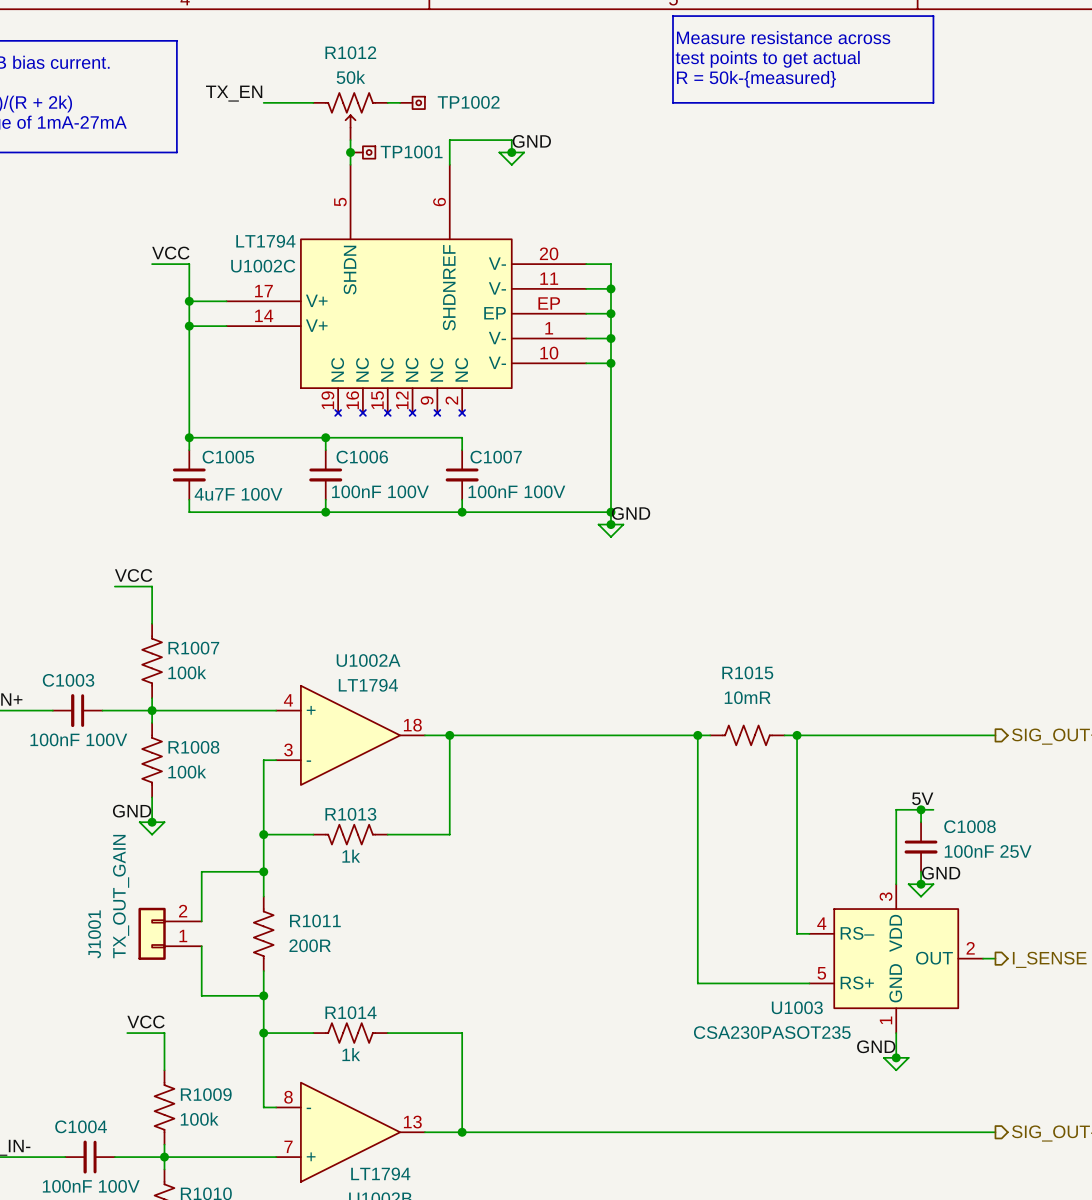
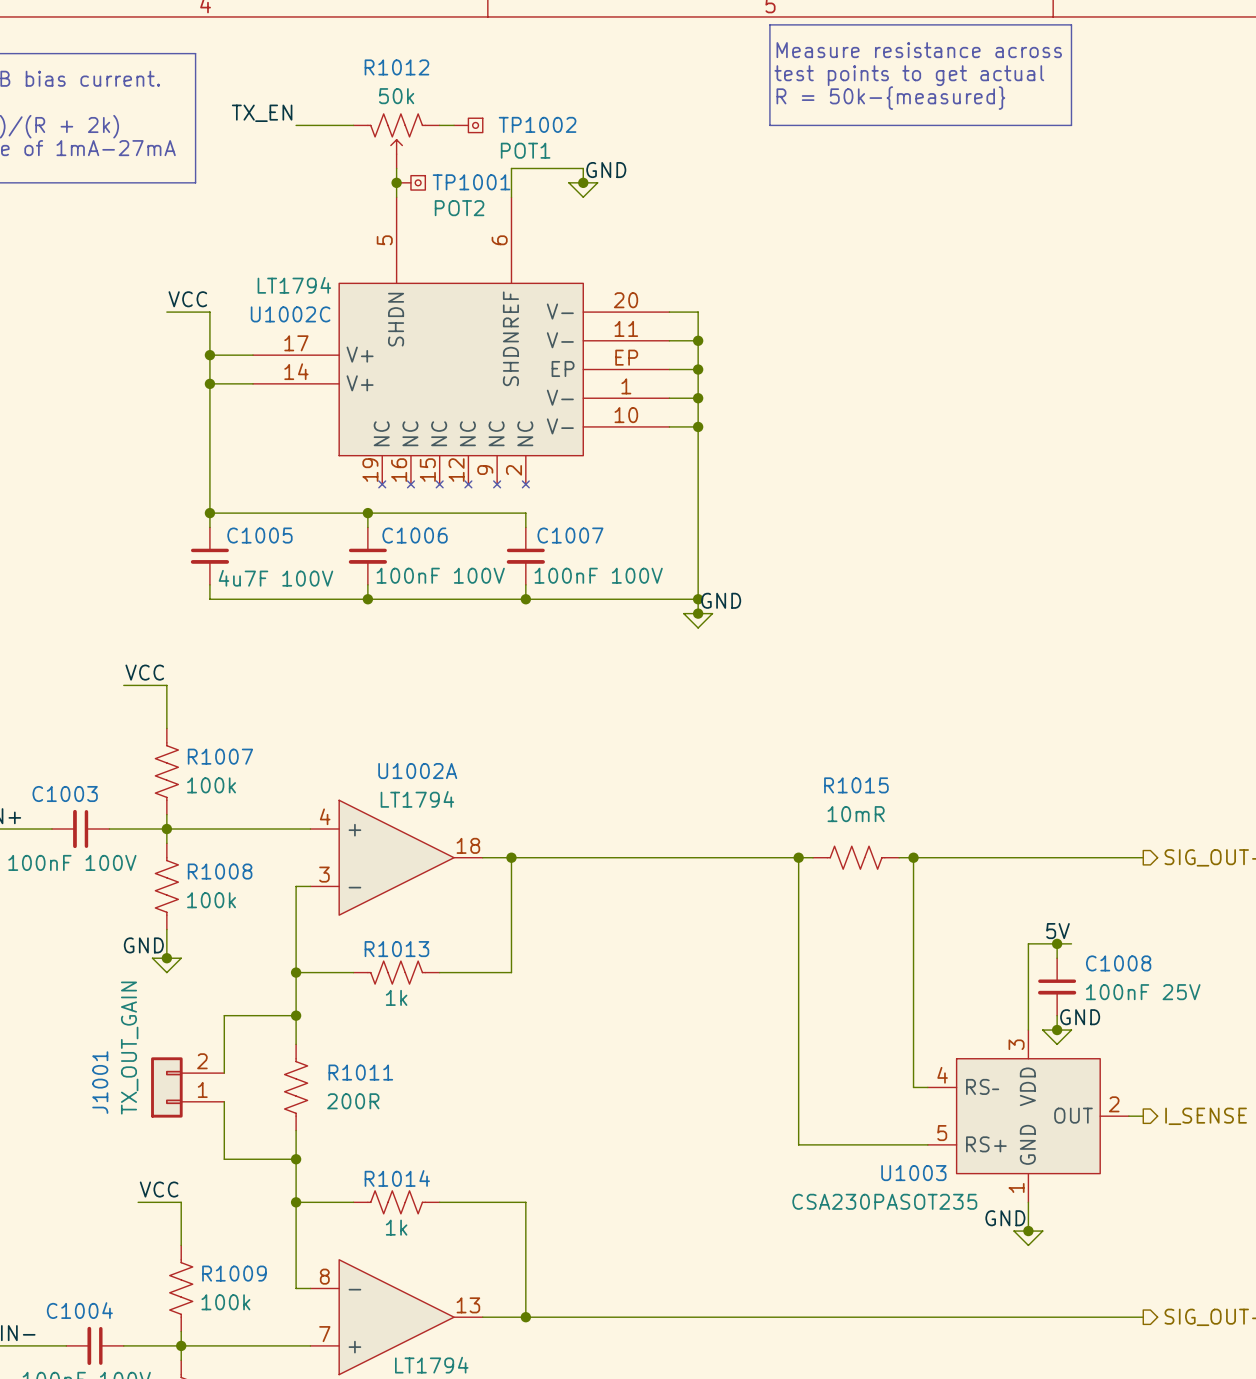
TP1002 value: none -> POT1 (525, 150)
TP1001 value: none -> POT2 (459, 208)

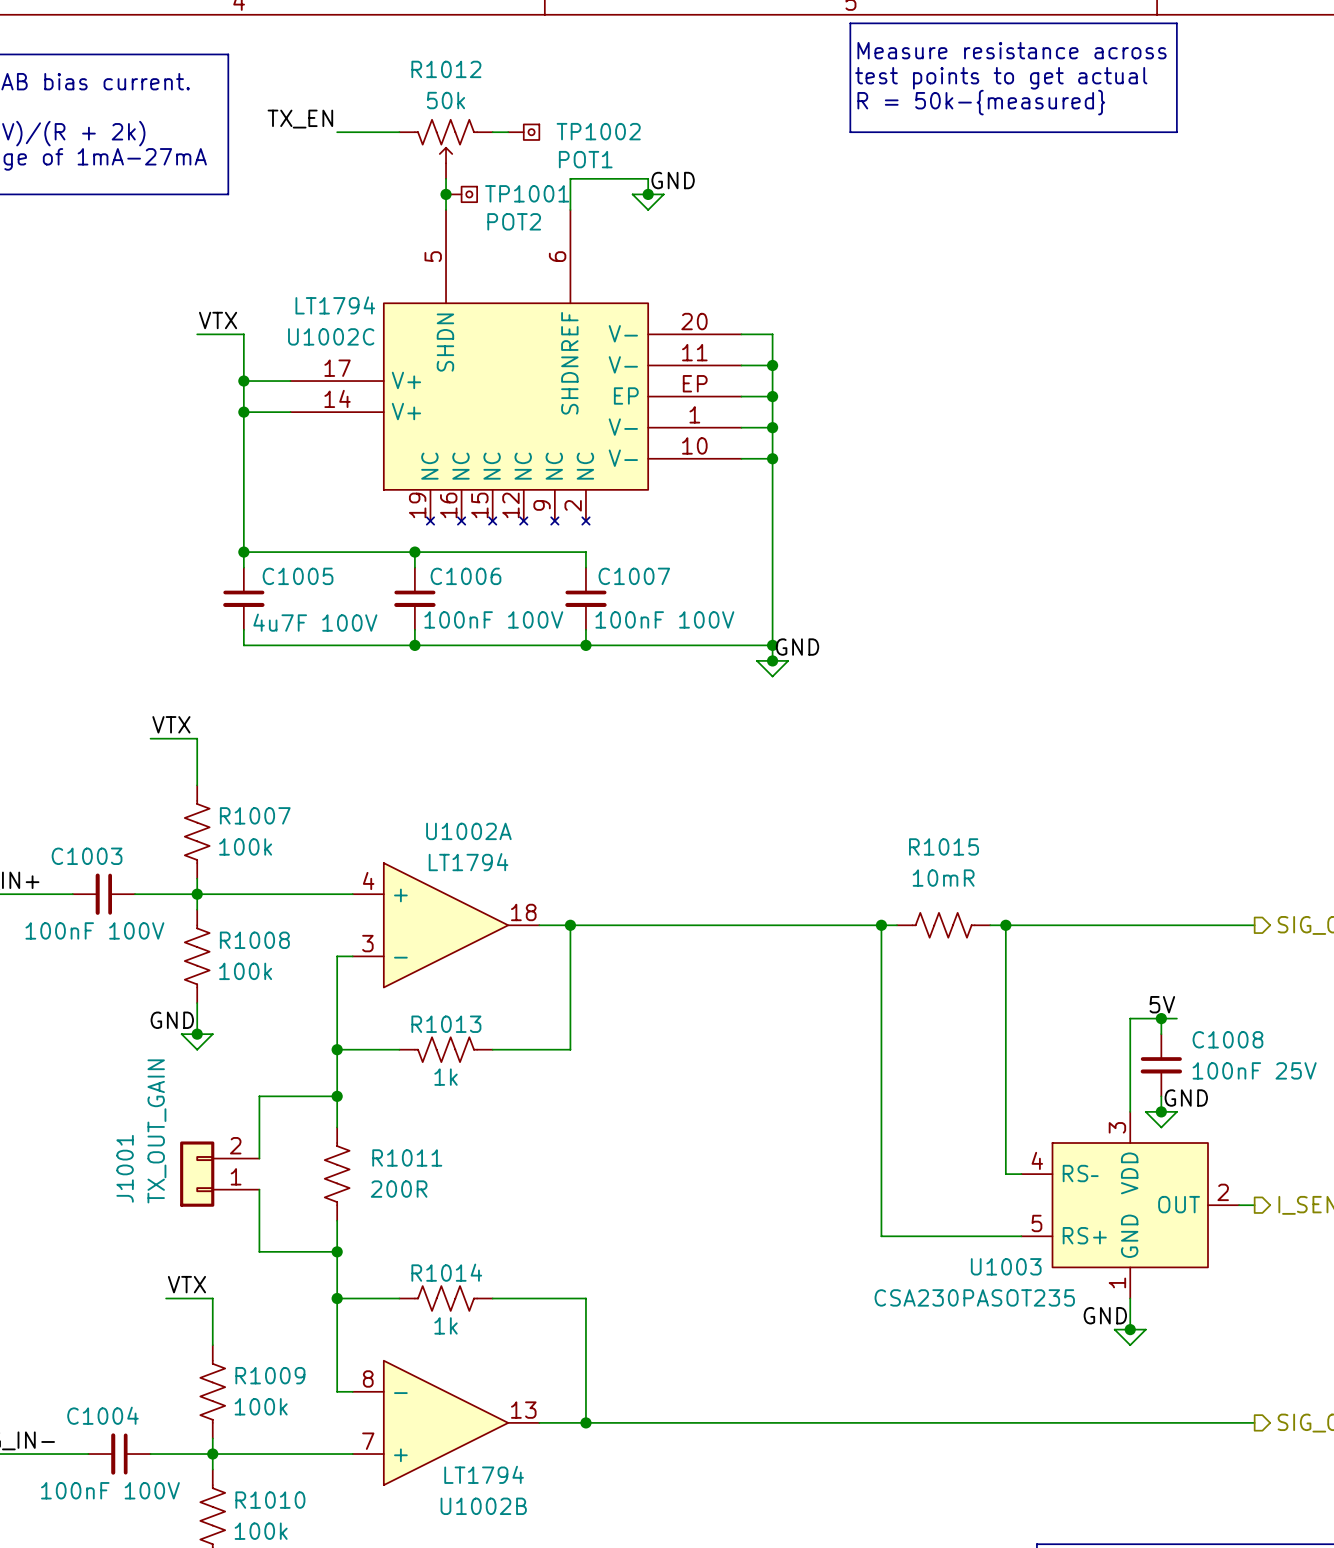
label: VCC (187, 299) -> VTX (218, 320)
label: VCC (144, 672) -> VTX (171, 724)
label: VCC (159, 1189) -> VTX (186, 1284)

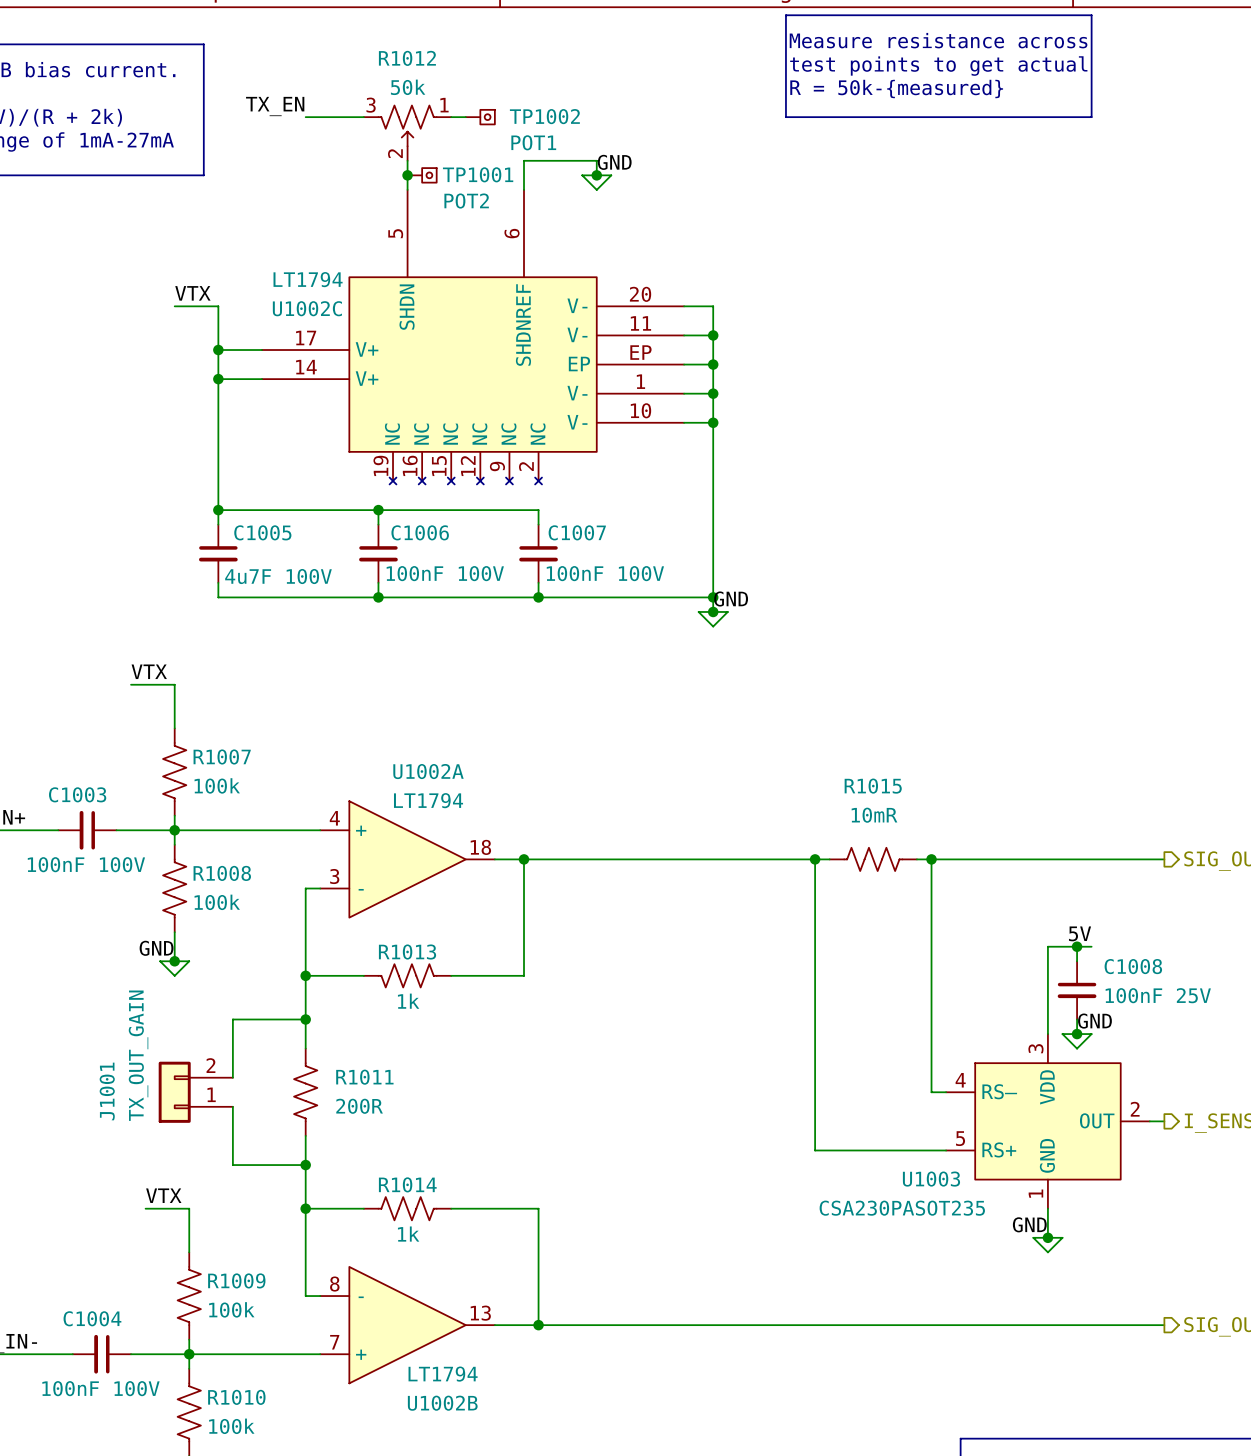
R1012 pin number: none -> 3 (371, 105)
R1012 pin number: none -> 1 (444, 105)
R1012 pin number: none -> 2 (395, 153)

